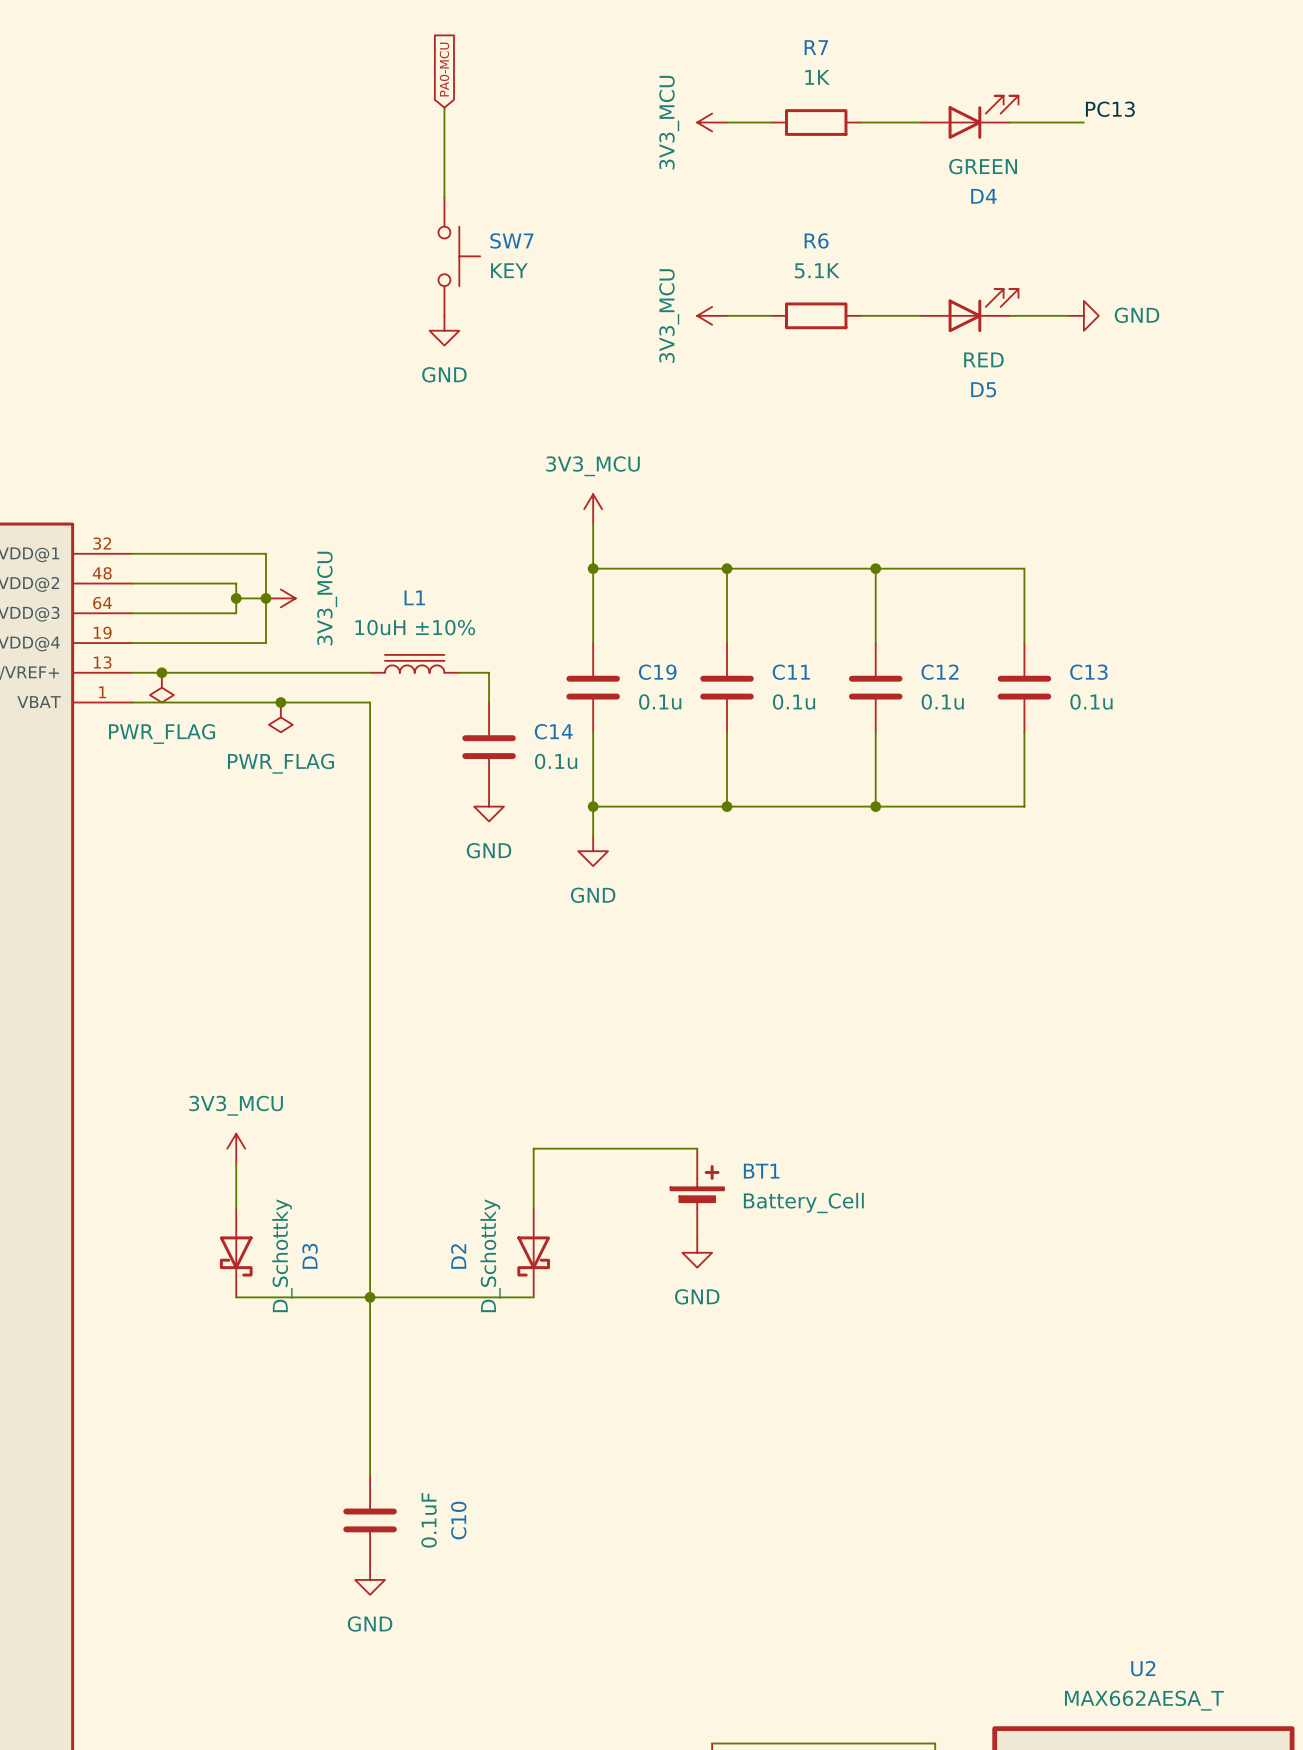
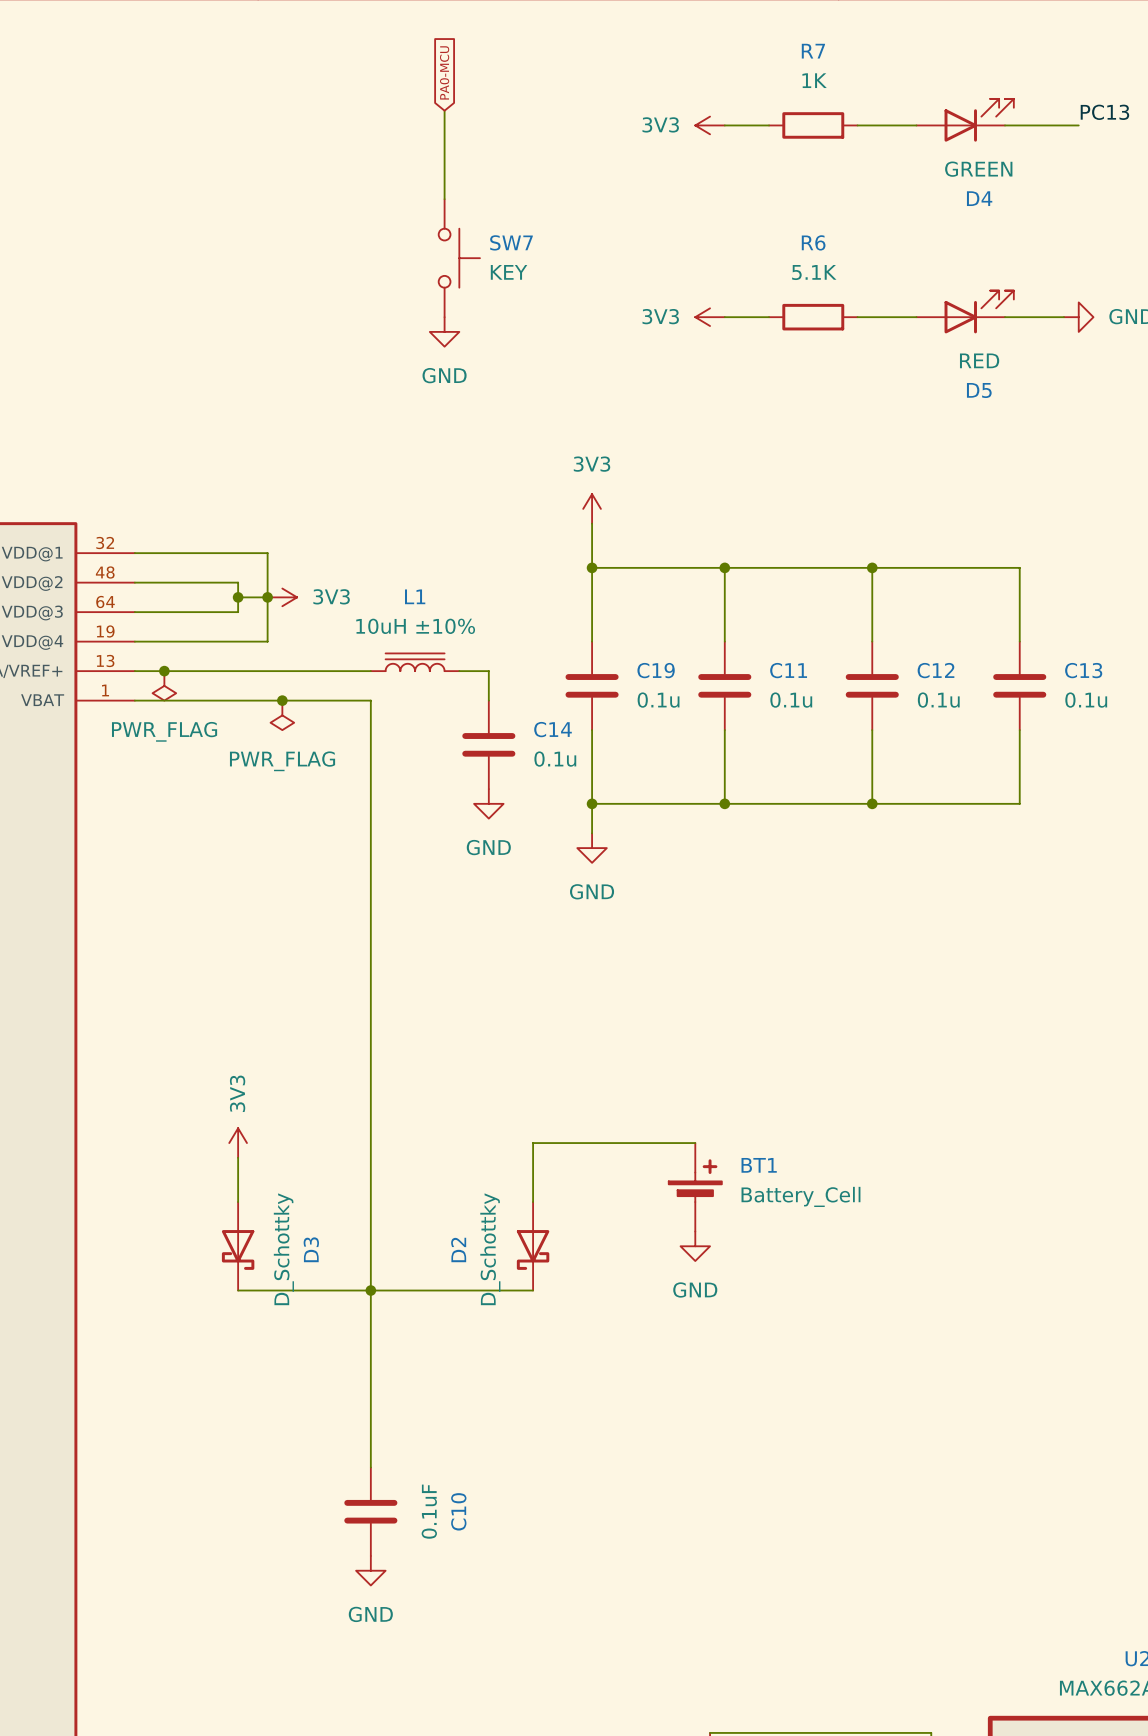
power symbol: 3V3_MCU (712, 122) -> 3V3 (710, 125)
power symbol: 3V3_MCU (712, 315) -> 3V3 (710, 317)
power symbol: 3V3_MCU (593, 509) -> 3V3 (592, 508)
power symbol: 3V3_MCU (280, 598) -> 3V3 (282, 597)
power symbol: 3V3_MCU (236, 1148) -> 3V3 (238, 1143)

